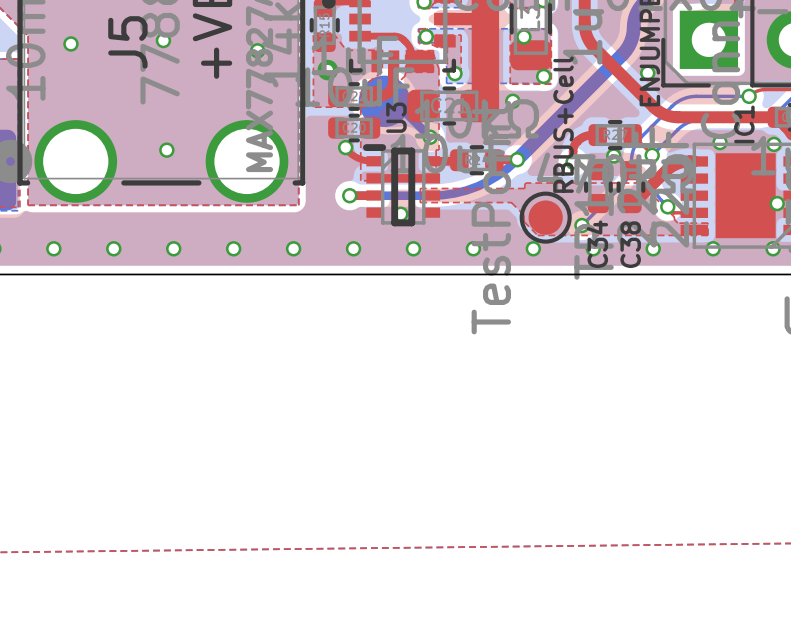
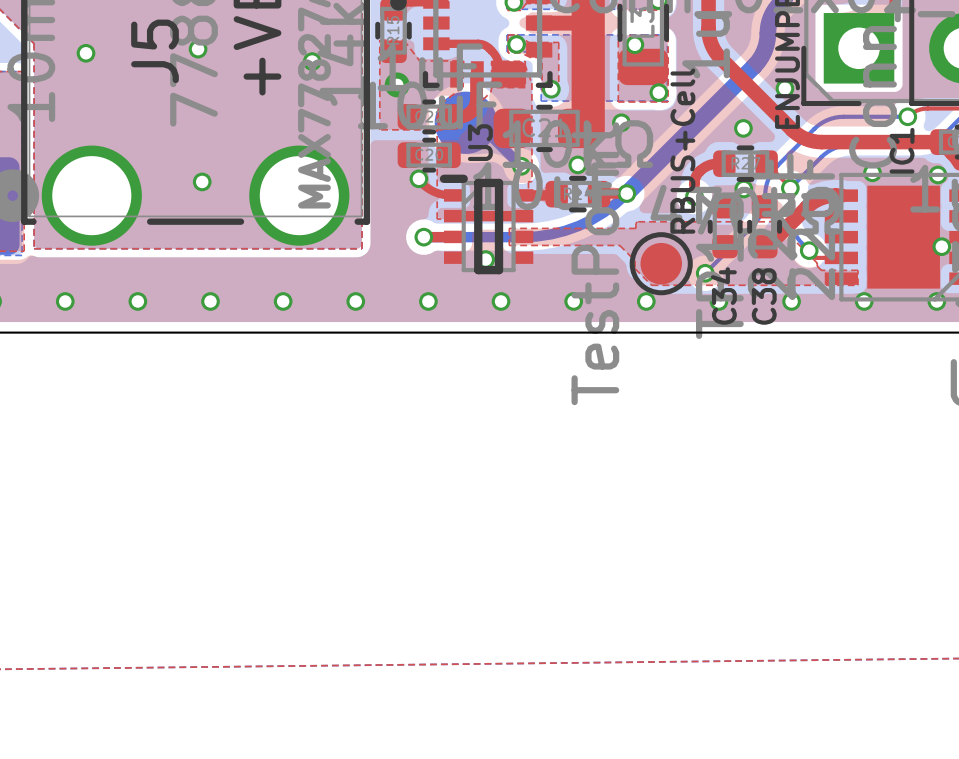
via: none -> (743, 128)
via: none -> (577, 164)

